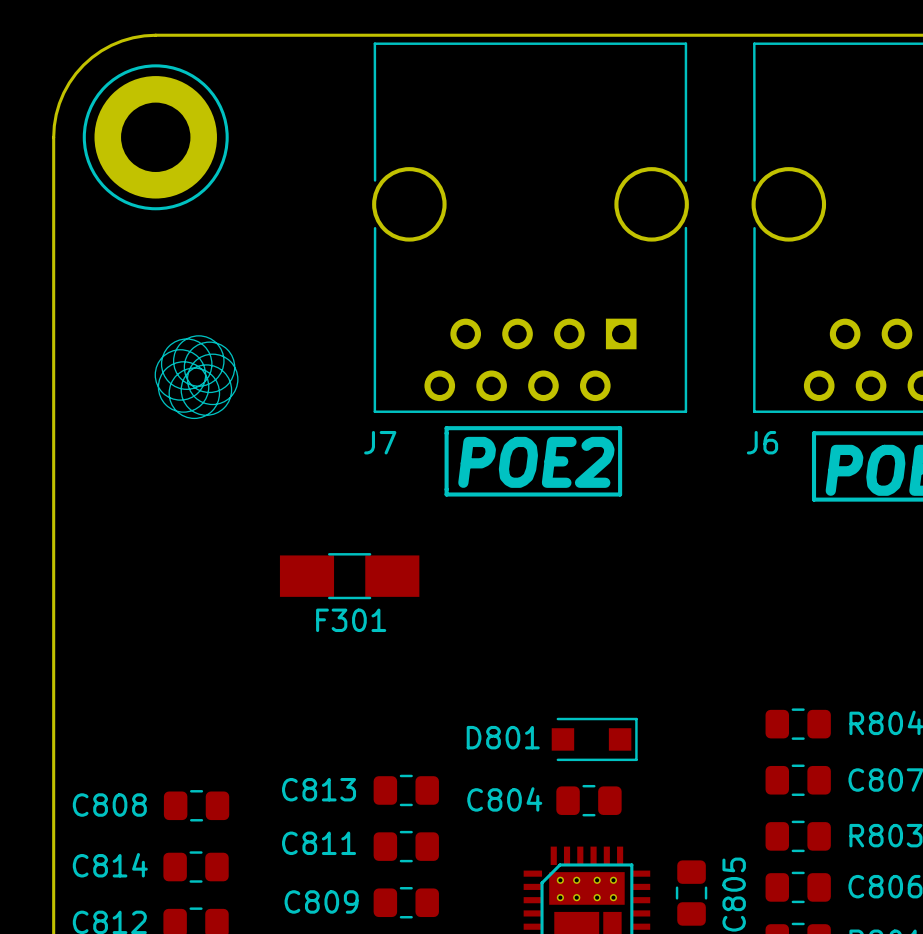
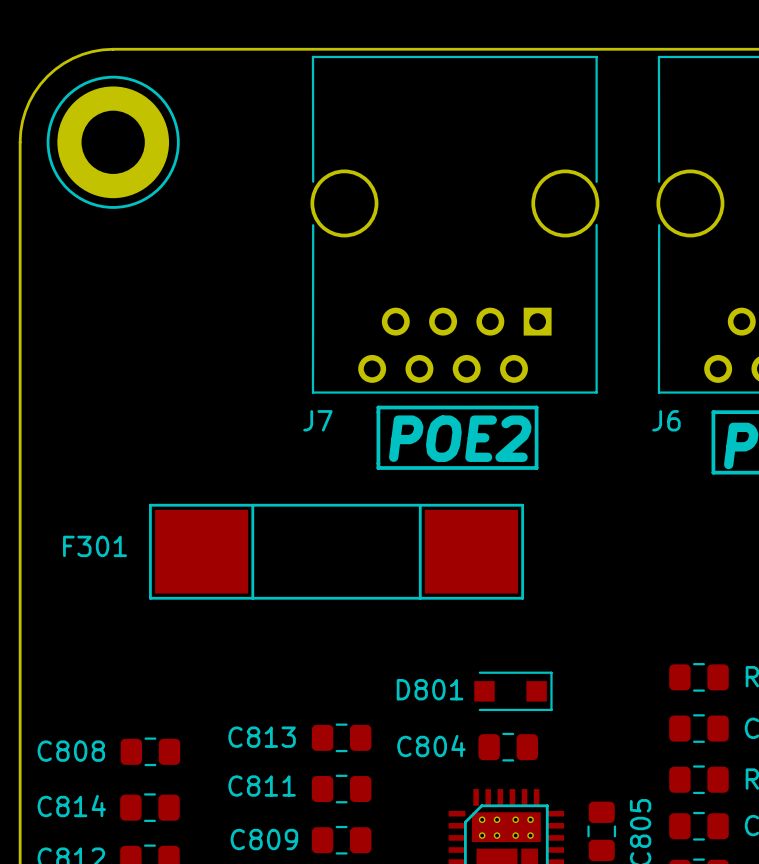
drawing: [154, 335, 239, 419] -> none
F301 footprint: [279, 553, 420, 600] -> [149, 503, 525, 600]
F301 name position: F301 (351, 620) -> F301 (95, 546)

